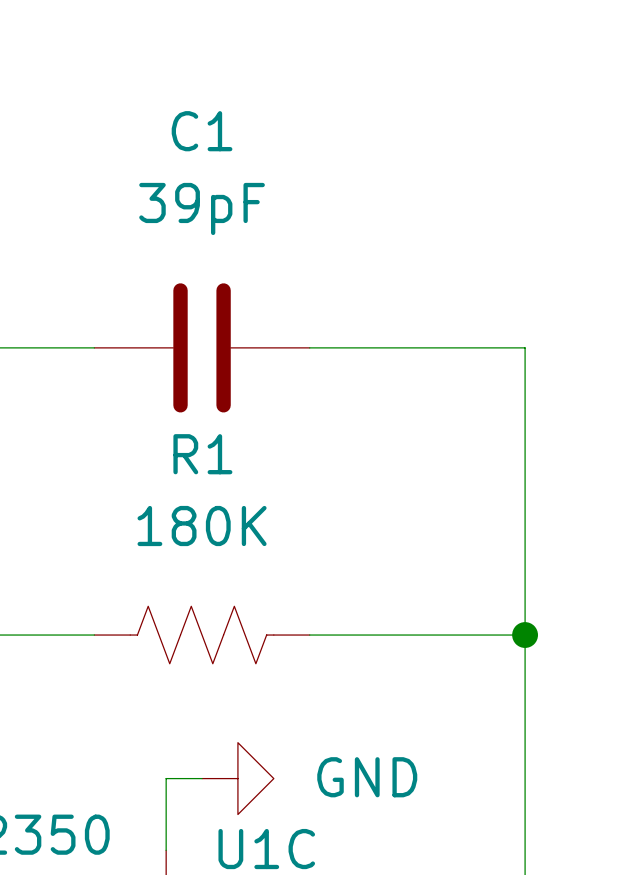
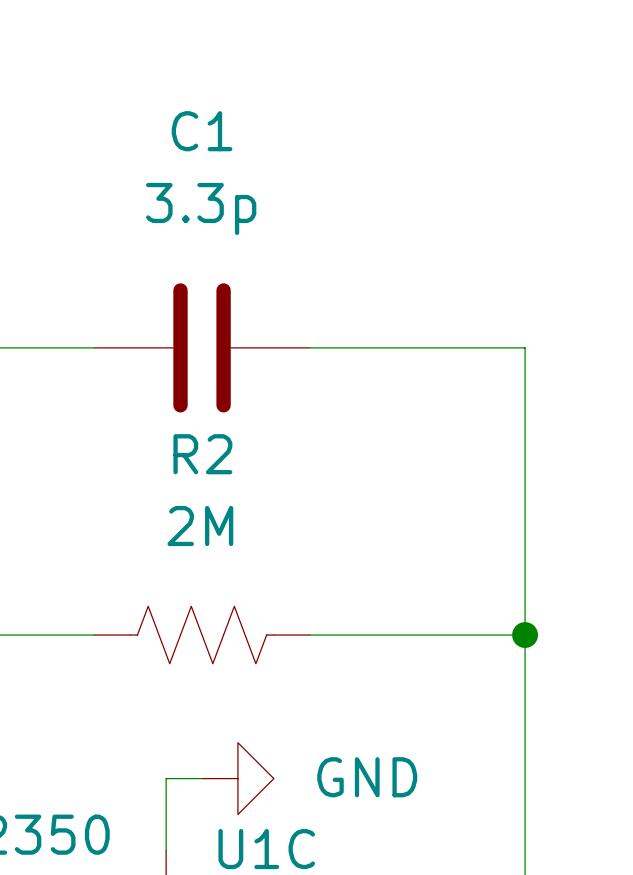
C1 value: 39pF (202, 208) -> 3.3p (201, 208)
R1 name: R1 (202, 454) -> R2 (202, 454)
R1 value: 180K (202, 526) -> 2M (200, 526)

